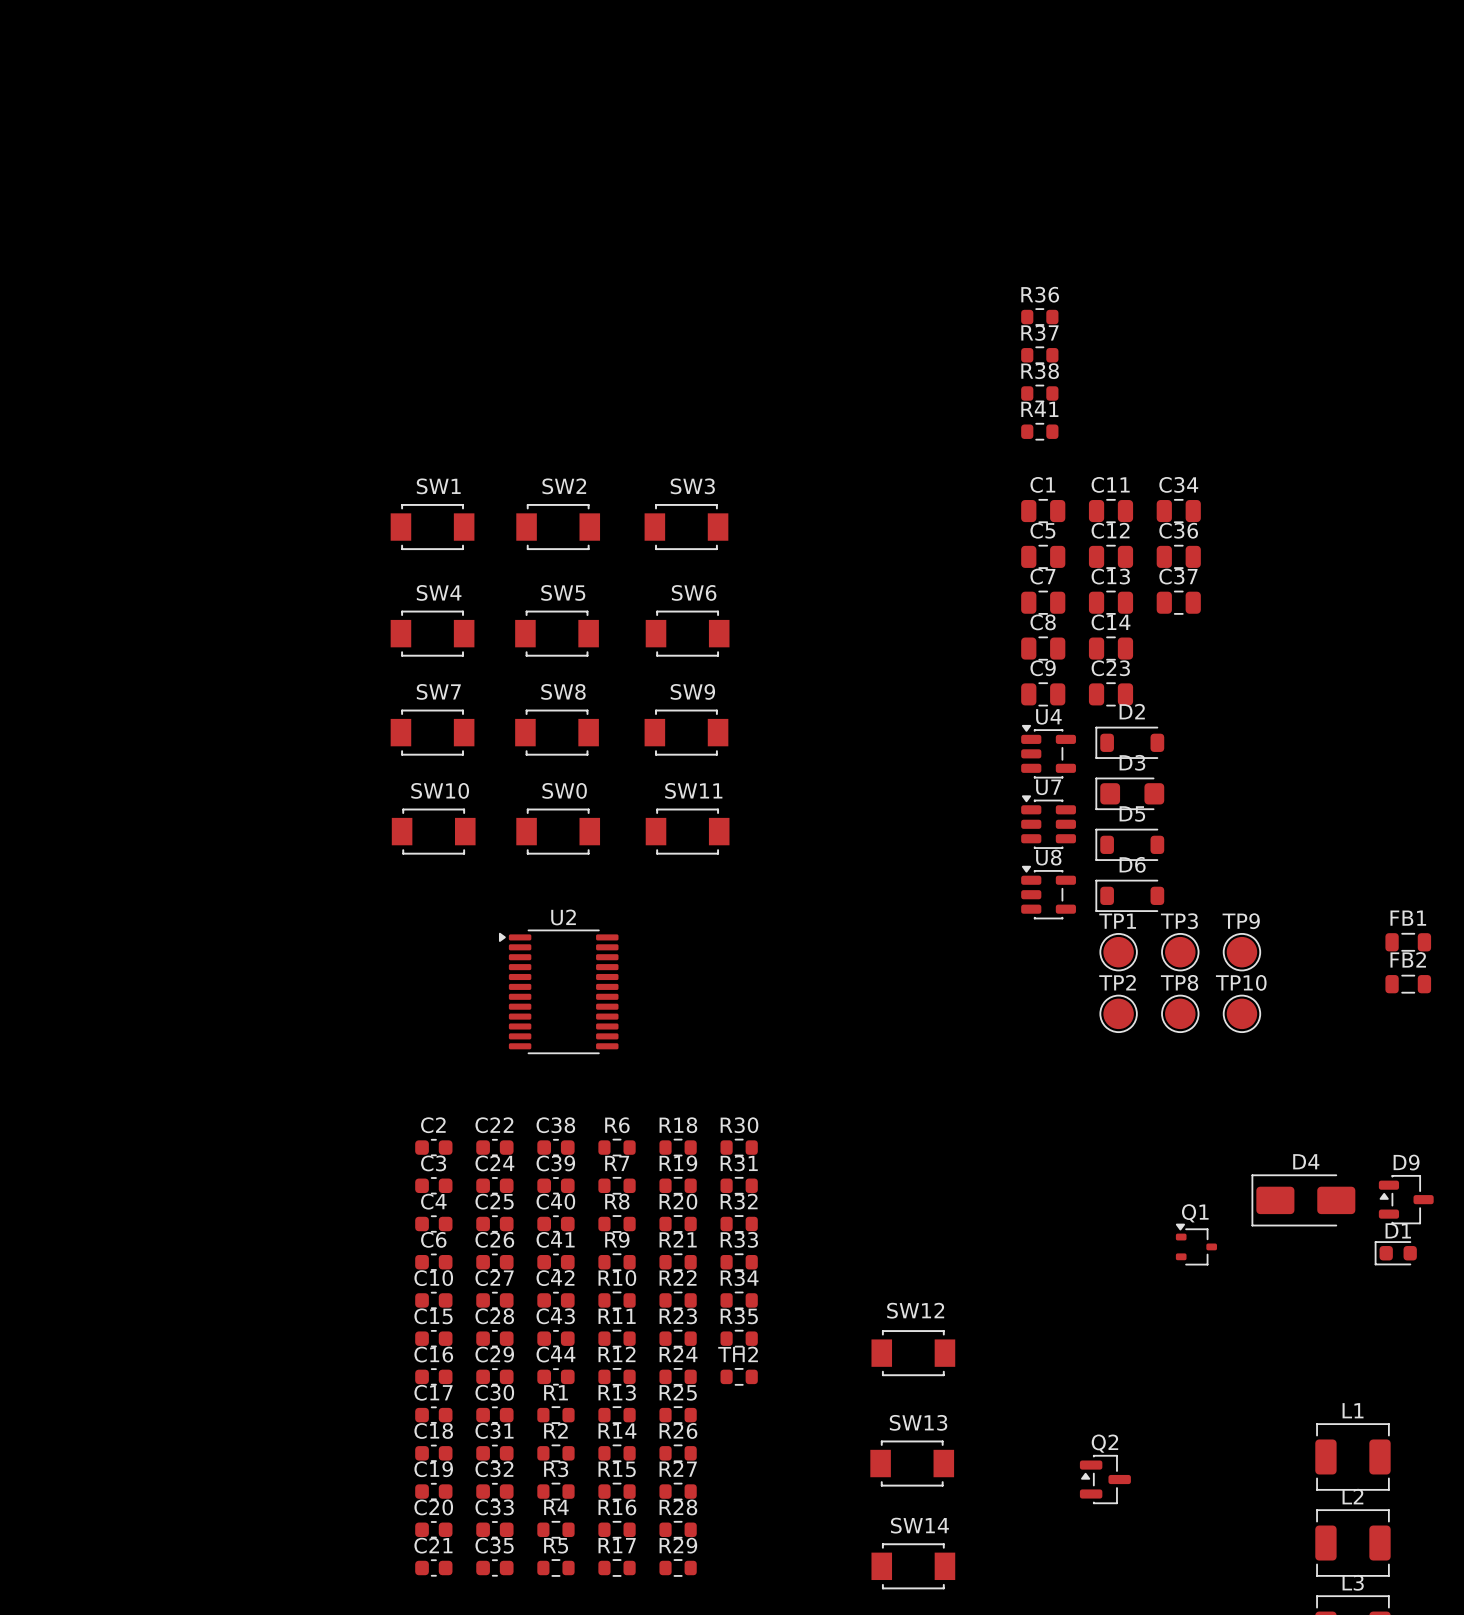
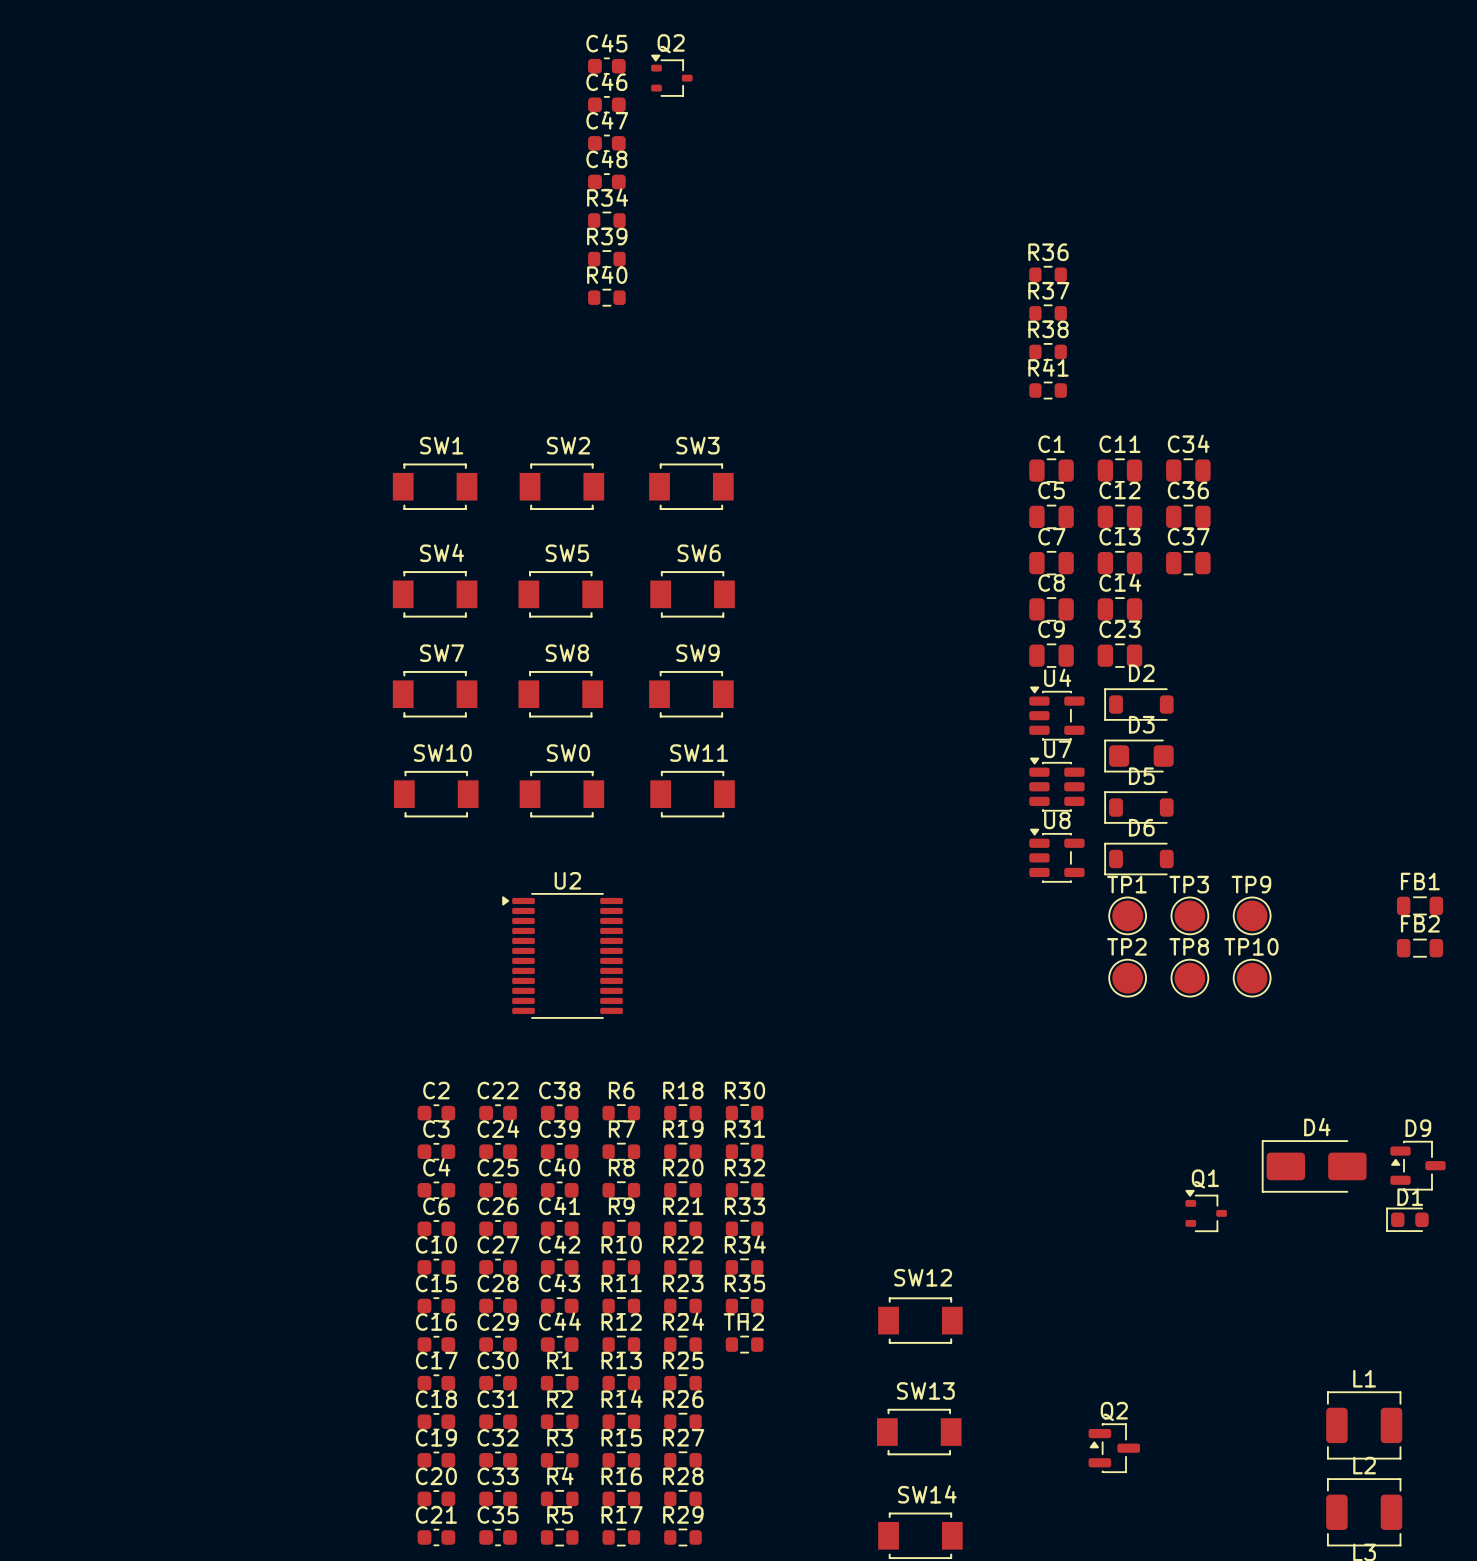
C45: none -> (606, 66)
Q2: none -> (671, 75)
C46: none -> (606, 104)
C47: none -> (606, 143)
C48: none -> (606, 181)
R34: none -> (606, 220)
R39: none -> (606, 259)
R40: none -> (606, 297)

